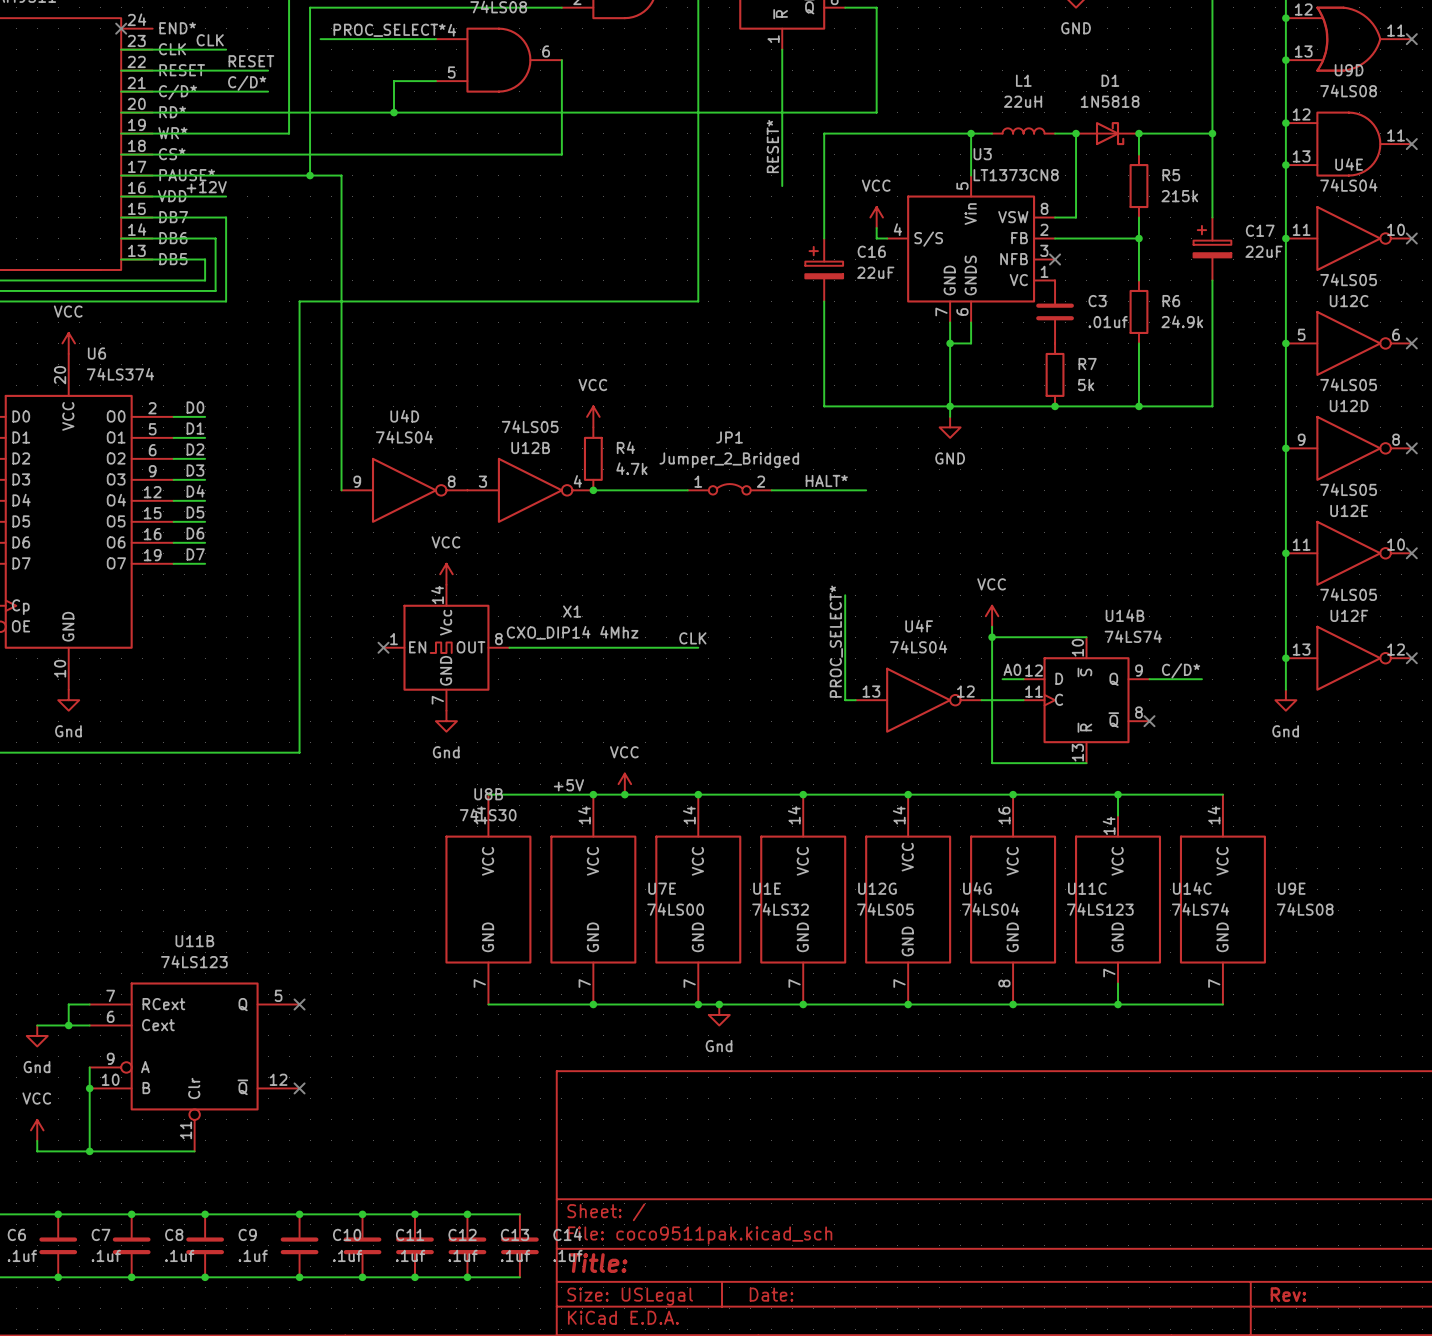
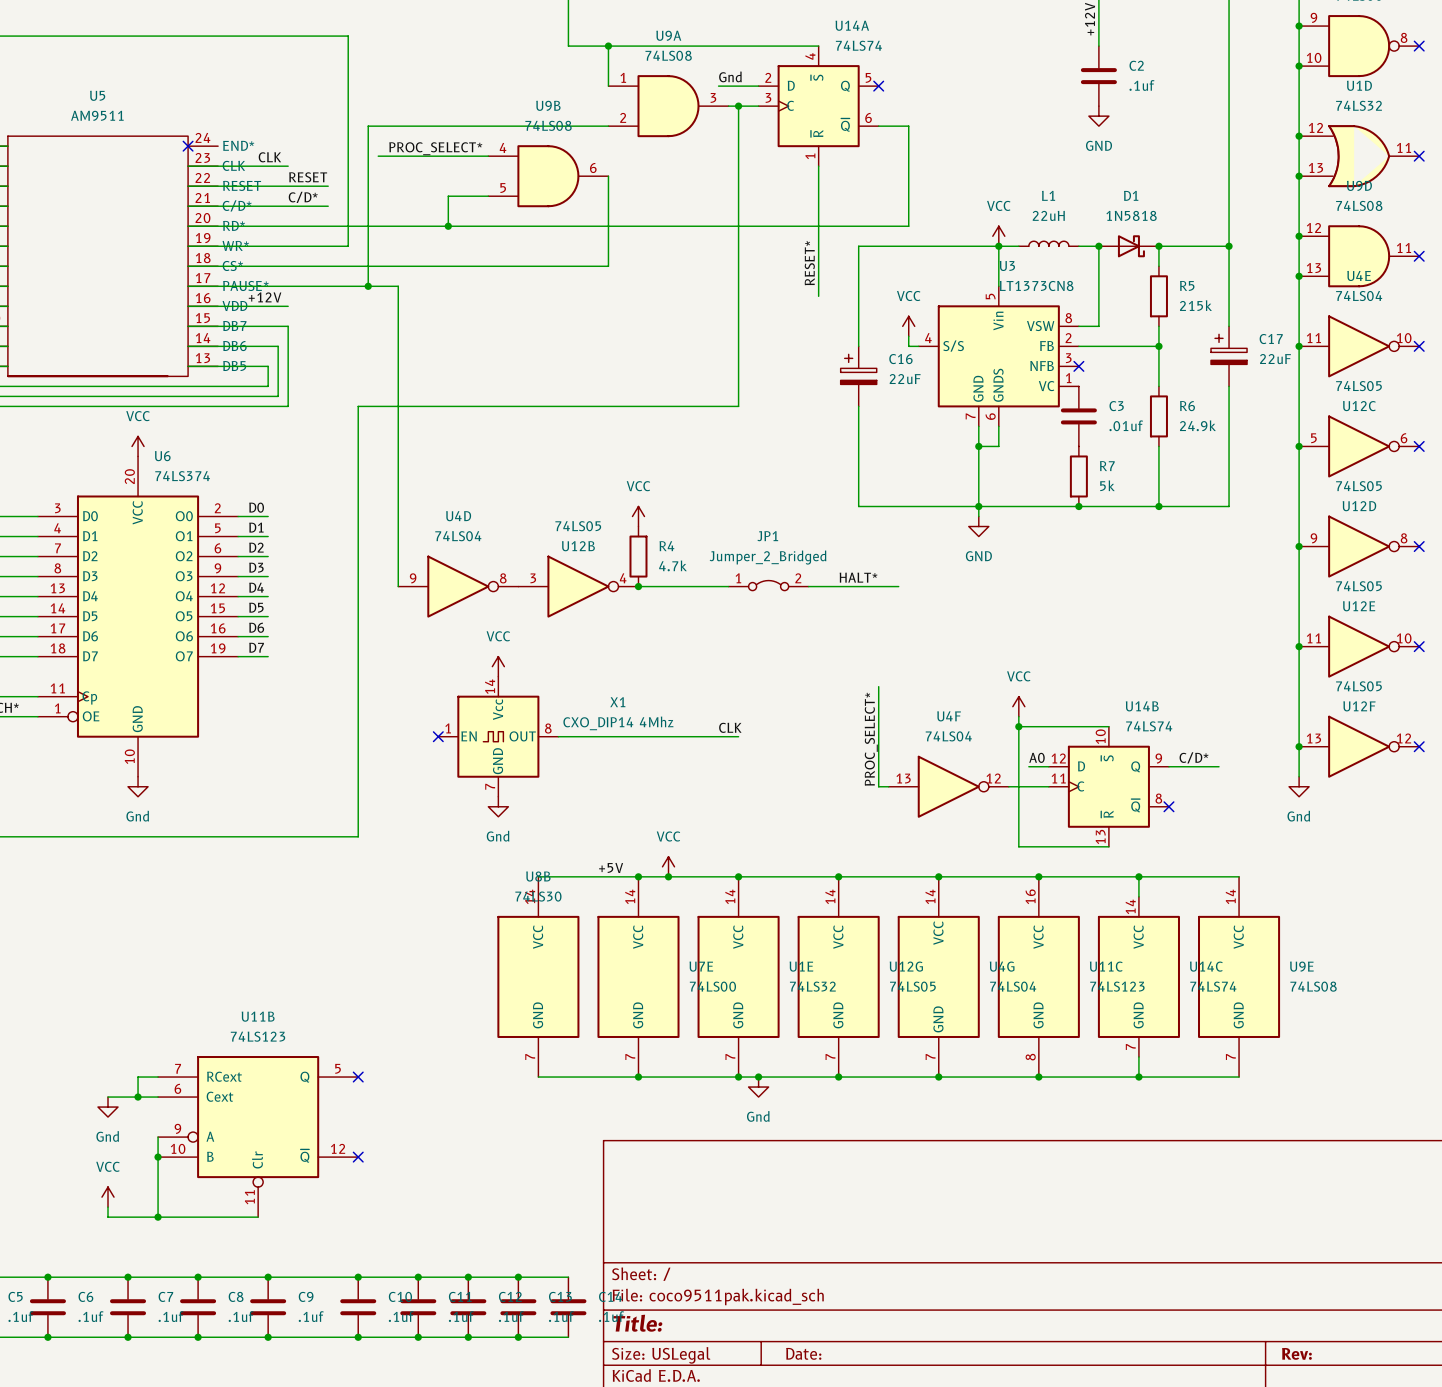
power symbol: none -> VCC (998, 236)

